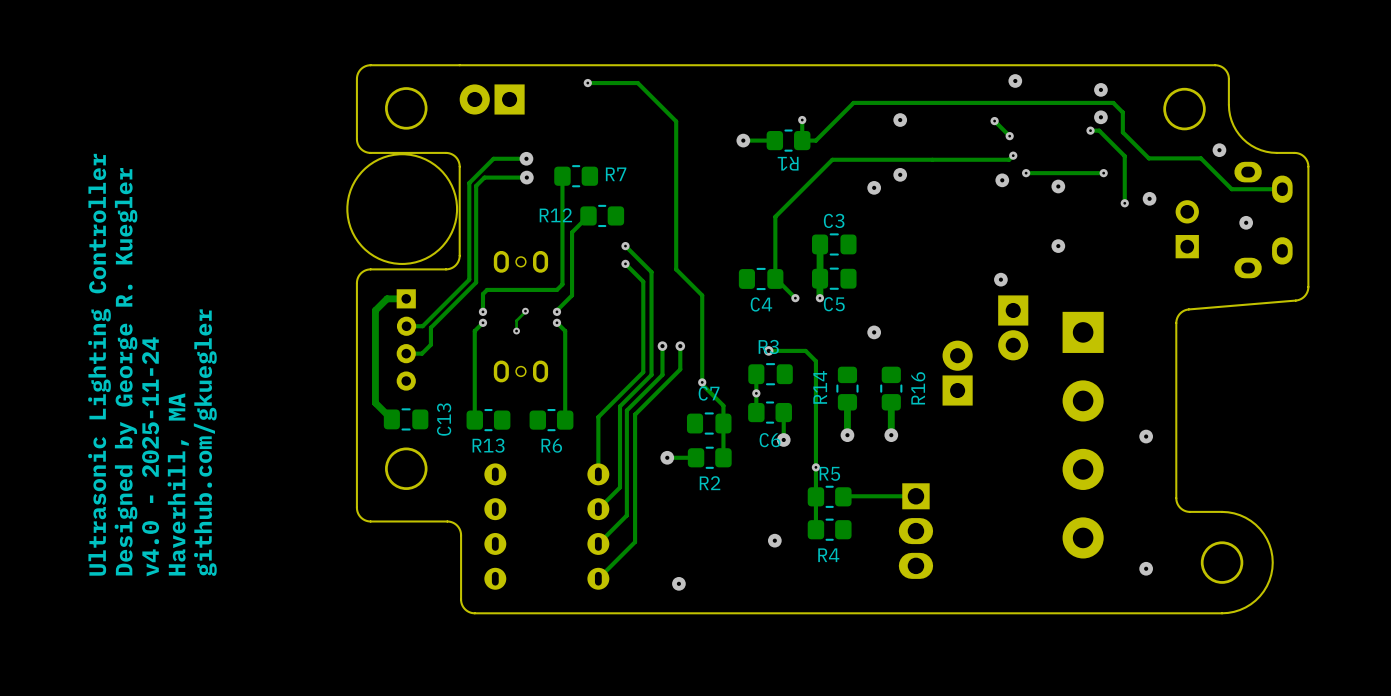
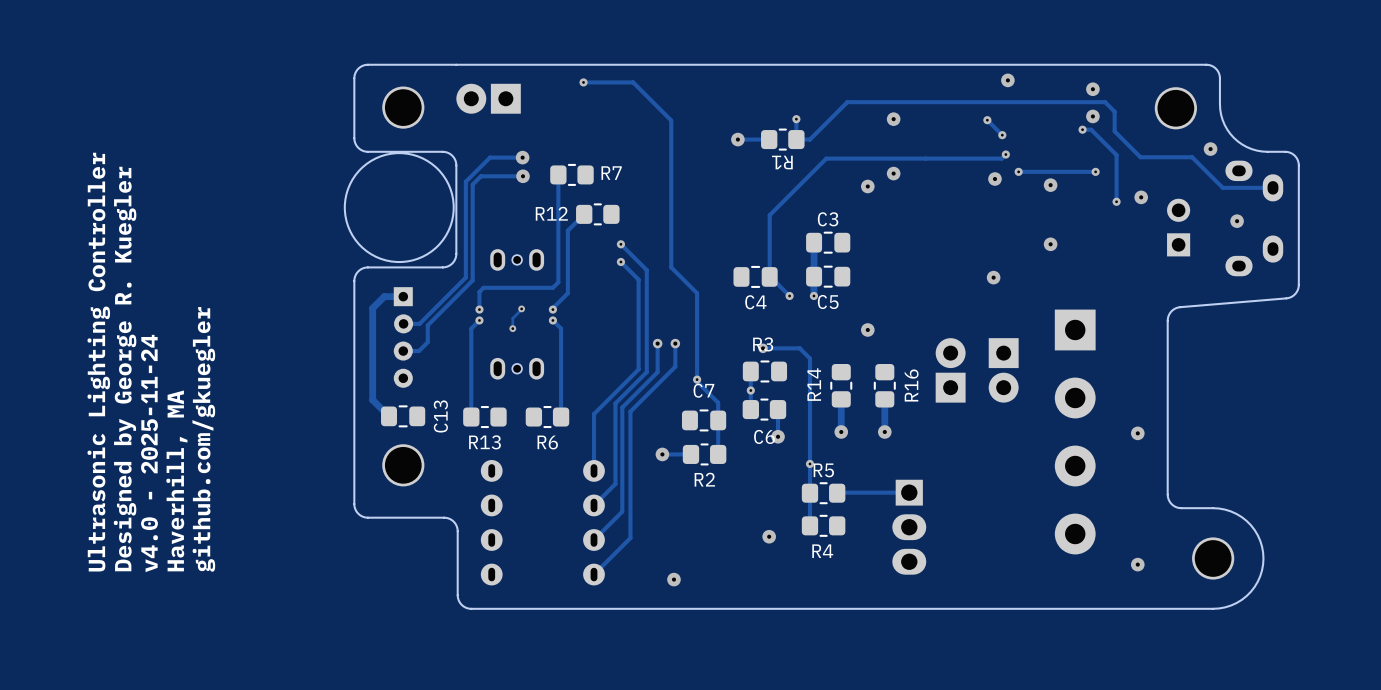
part position: (1013, 327) -> (1003, 370)

